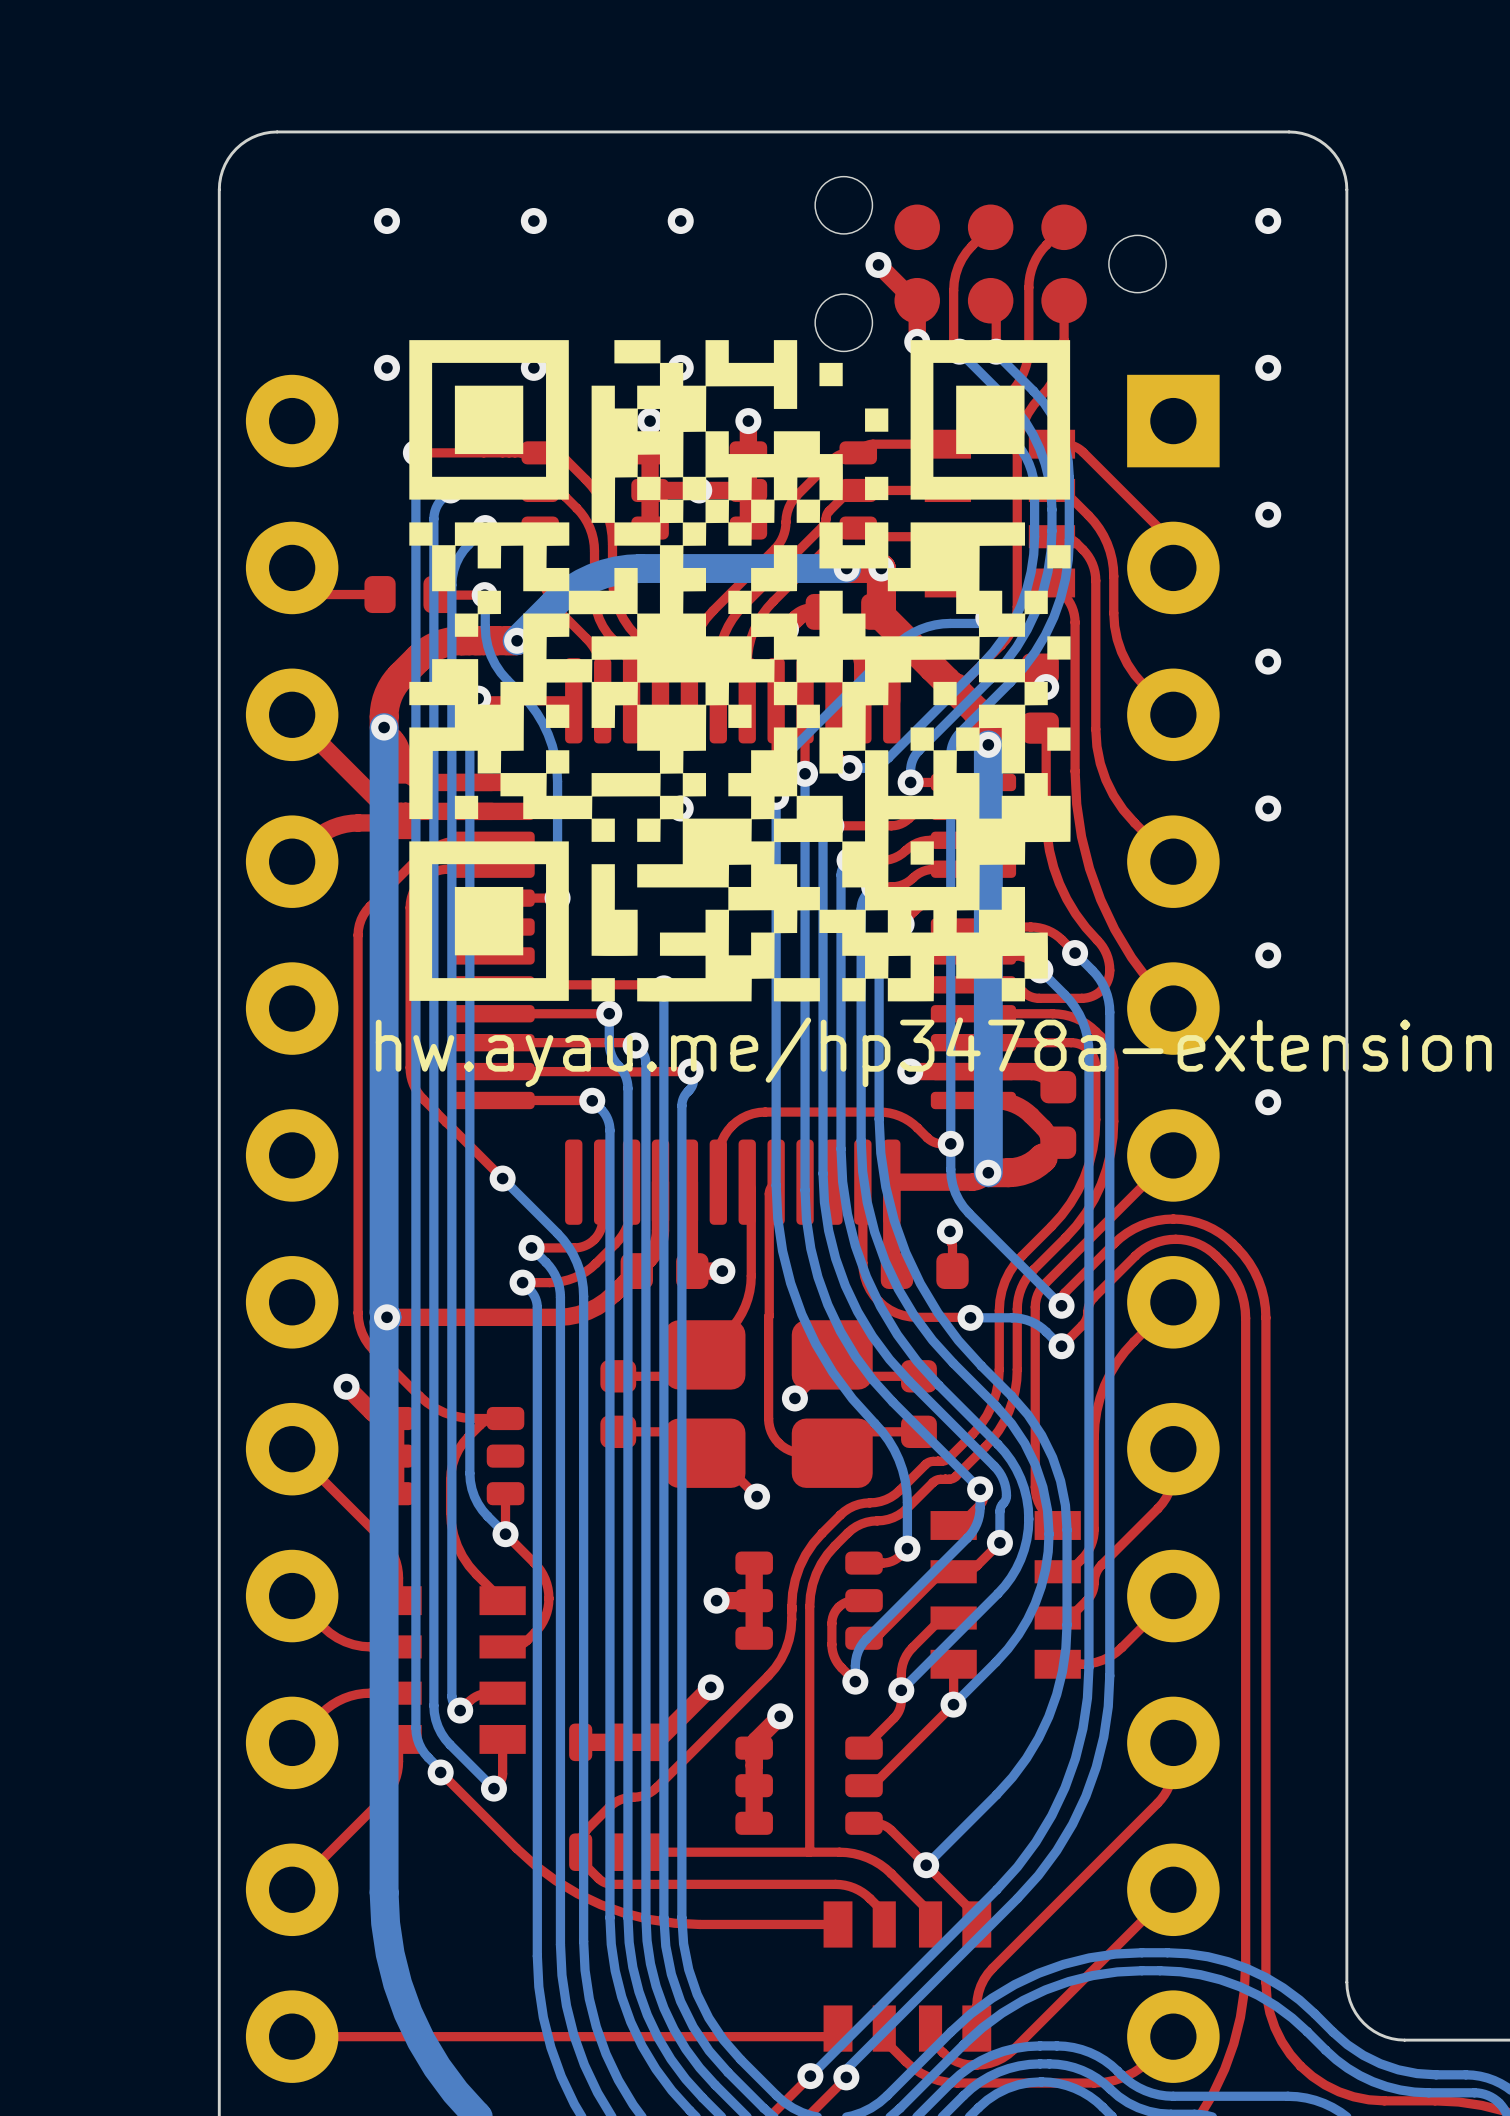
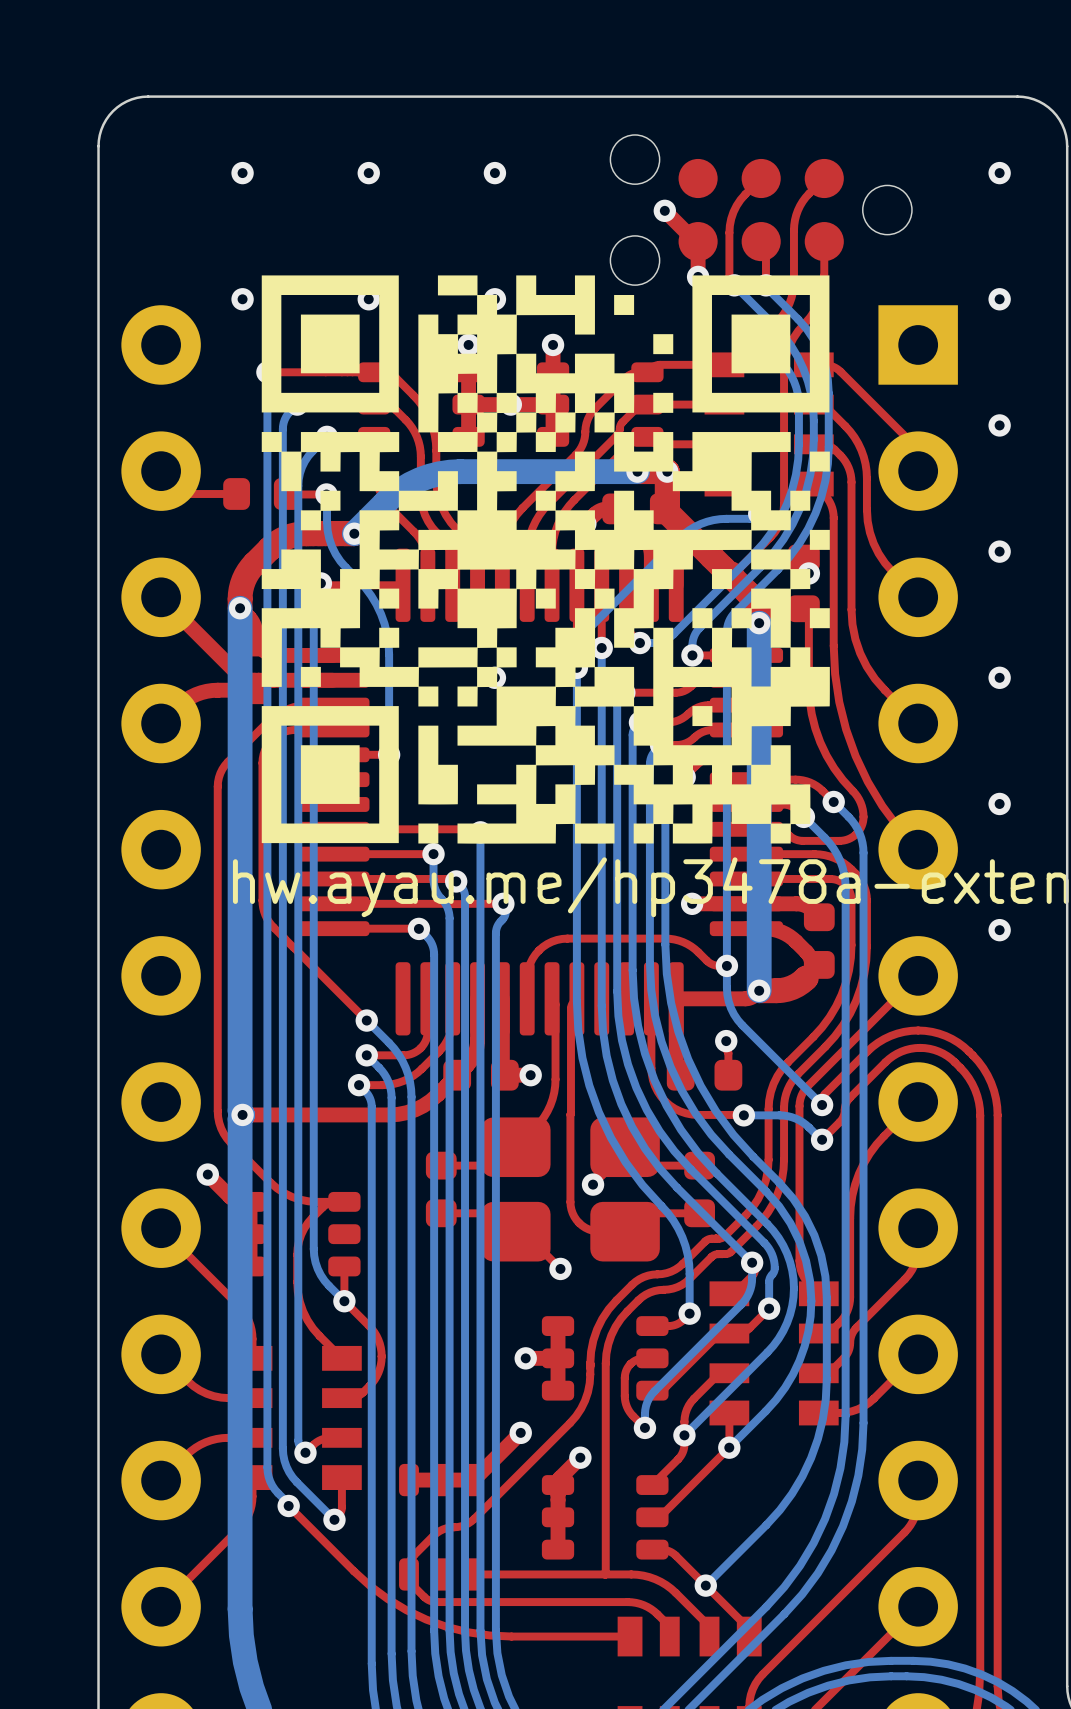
top track: none -> (341, 995) (366, 1020)
bottom track: (502, 1178) (531, 1207) -> none
via position: (502, 1178) -> (366, 1020)

